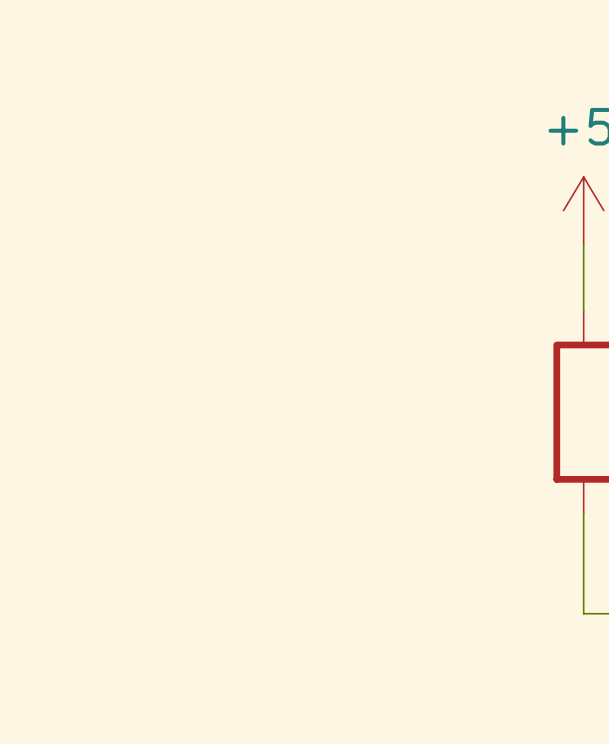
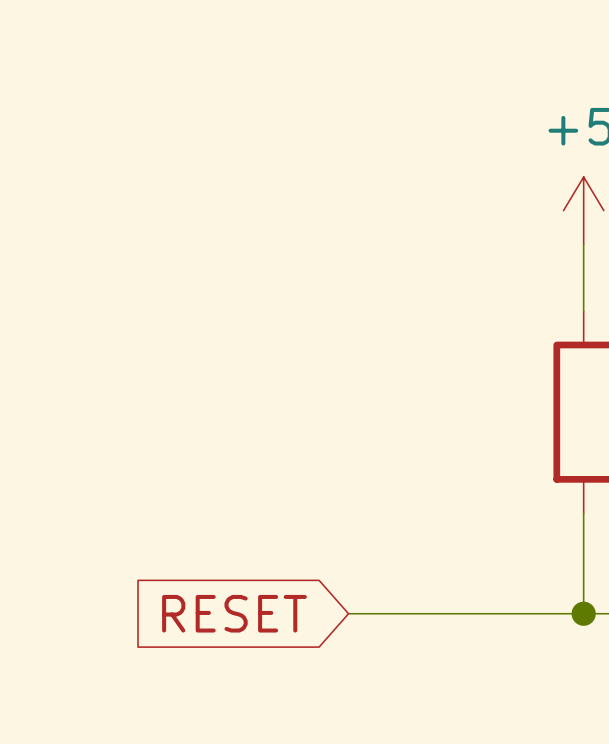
global label: none -> RESET (234, 613)
wire: none -> (348, 613) (583, 613)
junction: none -> (583, 613)

